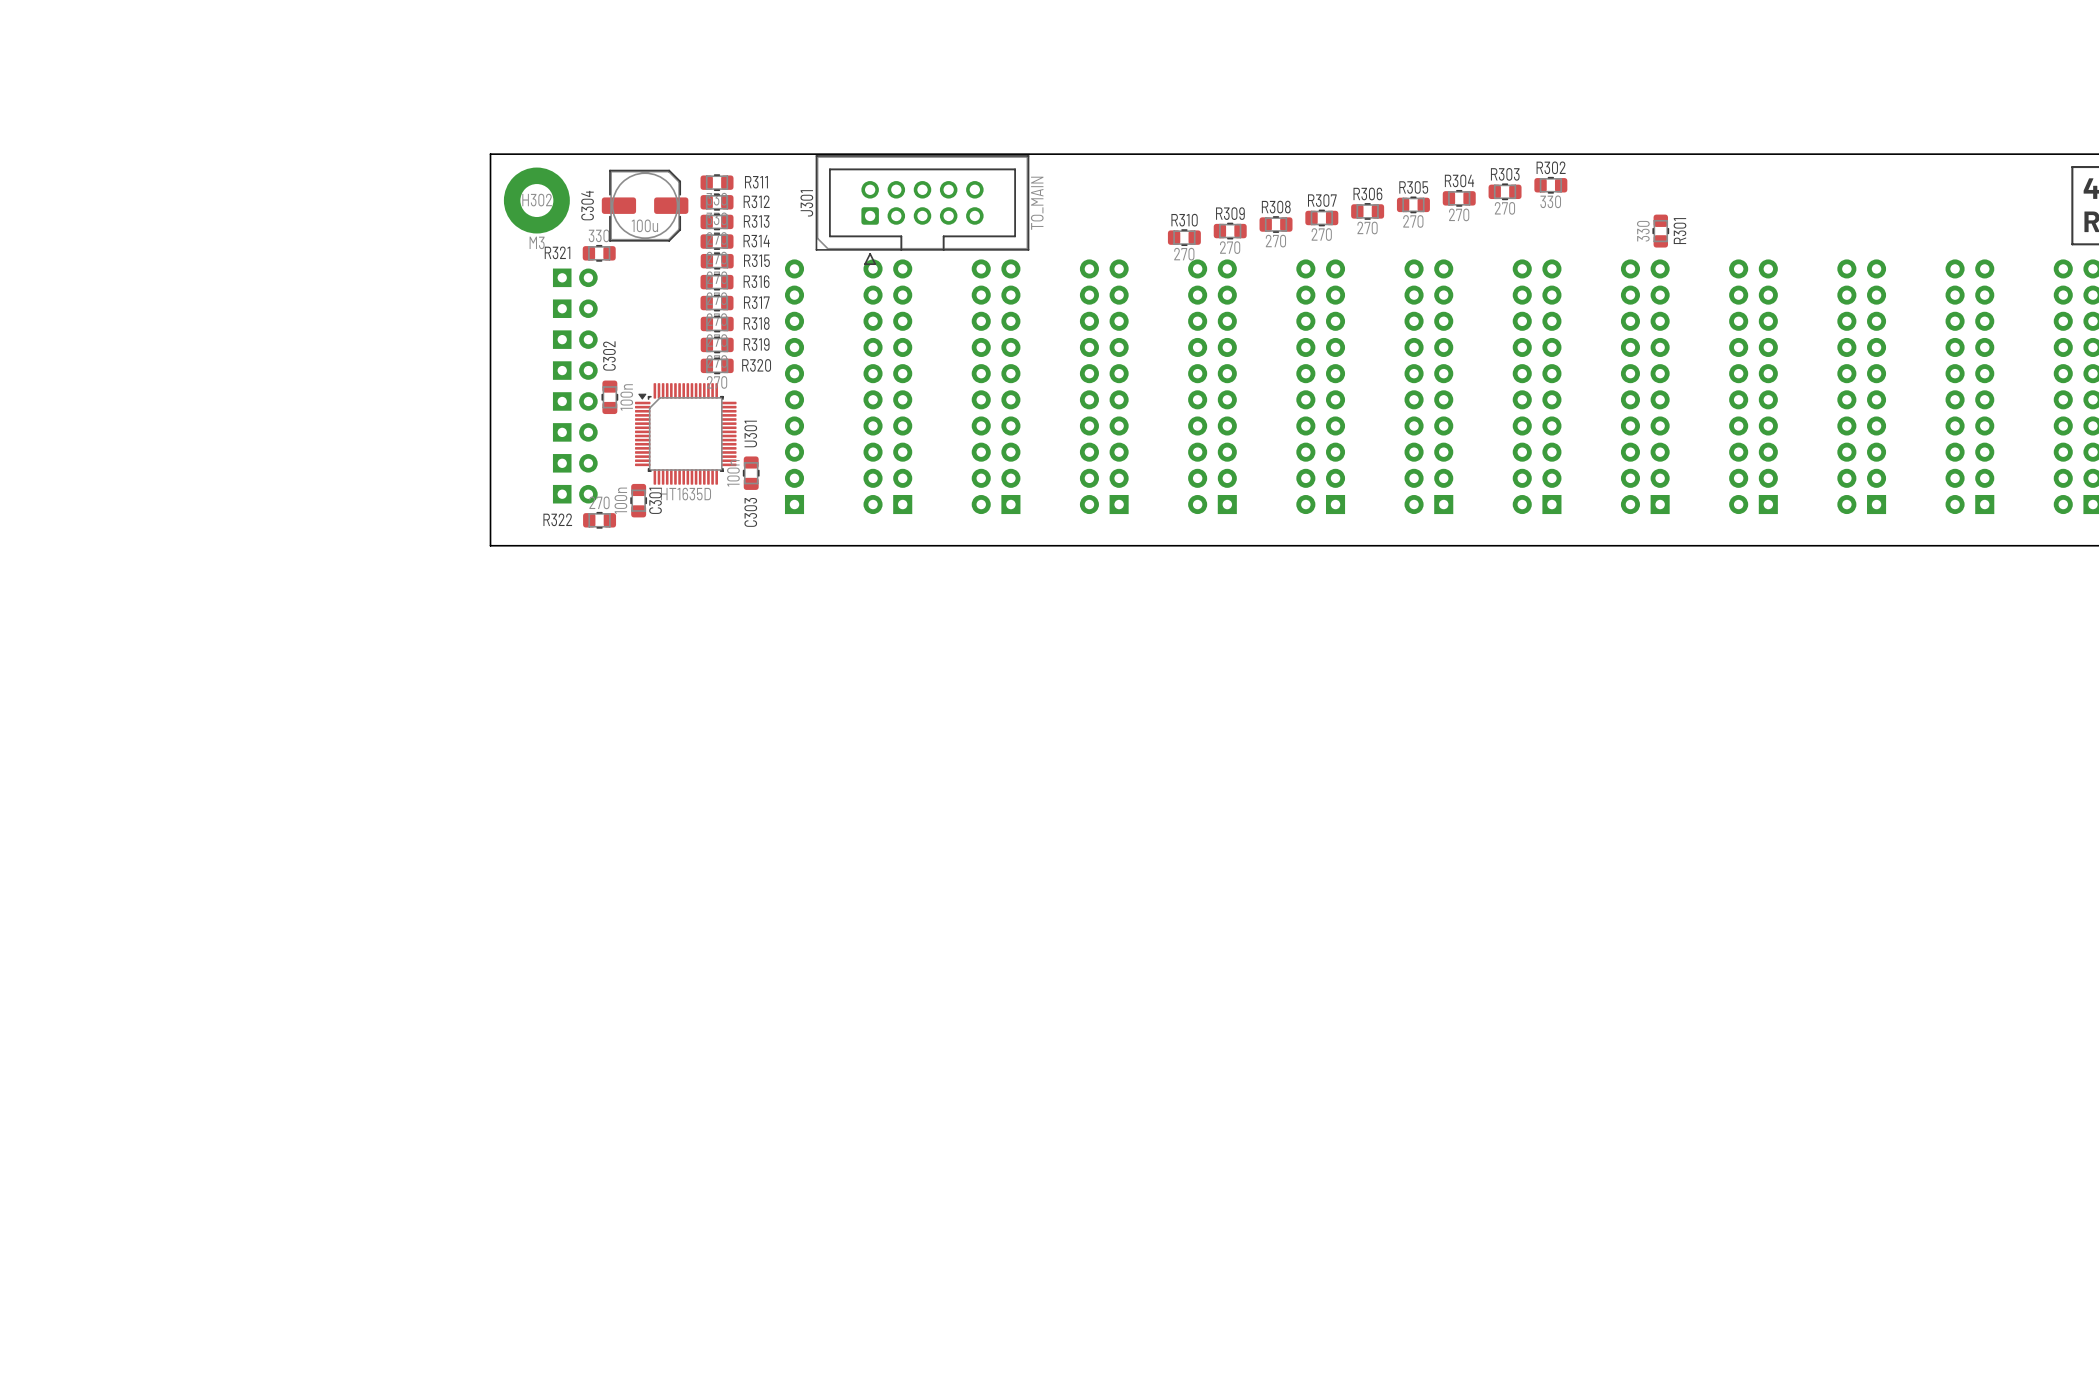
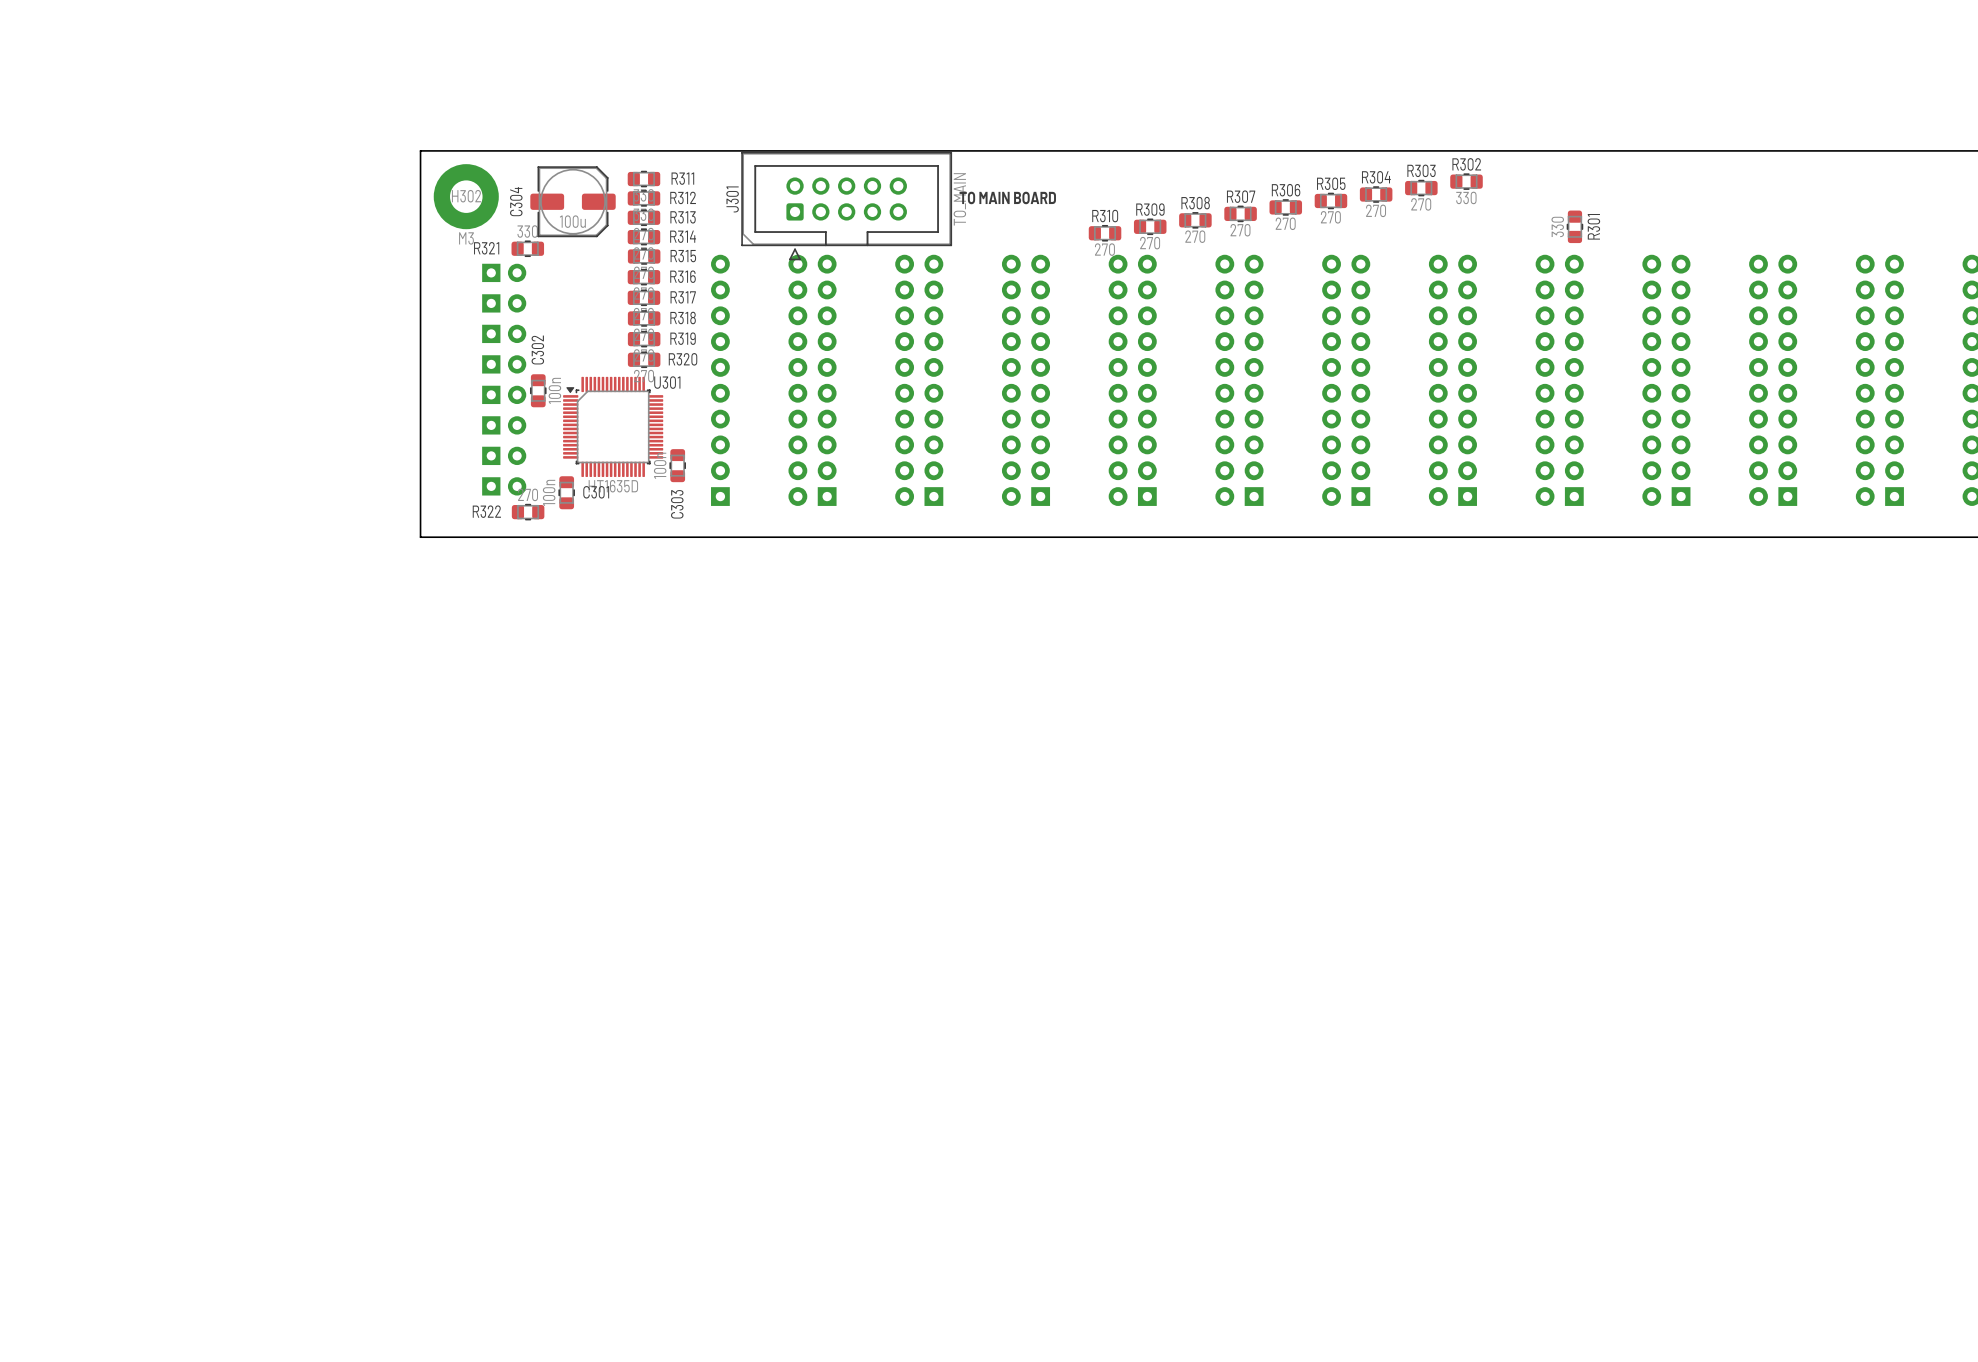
text: none -> TO MAIN BOARD (1007, 197)
U301 name rotation: 0° (750, 433) -> 90° clockwise (667, 382)
U301 name position: U301 (750, 433) -> U301 (667, 382)
C301 name rotation: 0° (655, 500) -> 90° clockwise (596, 492)

